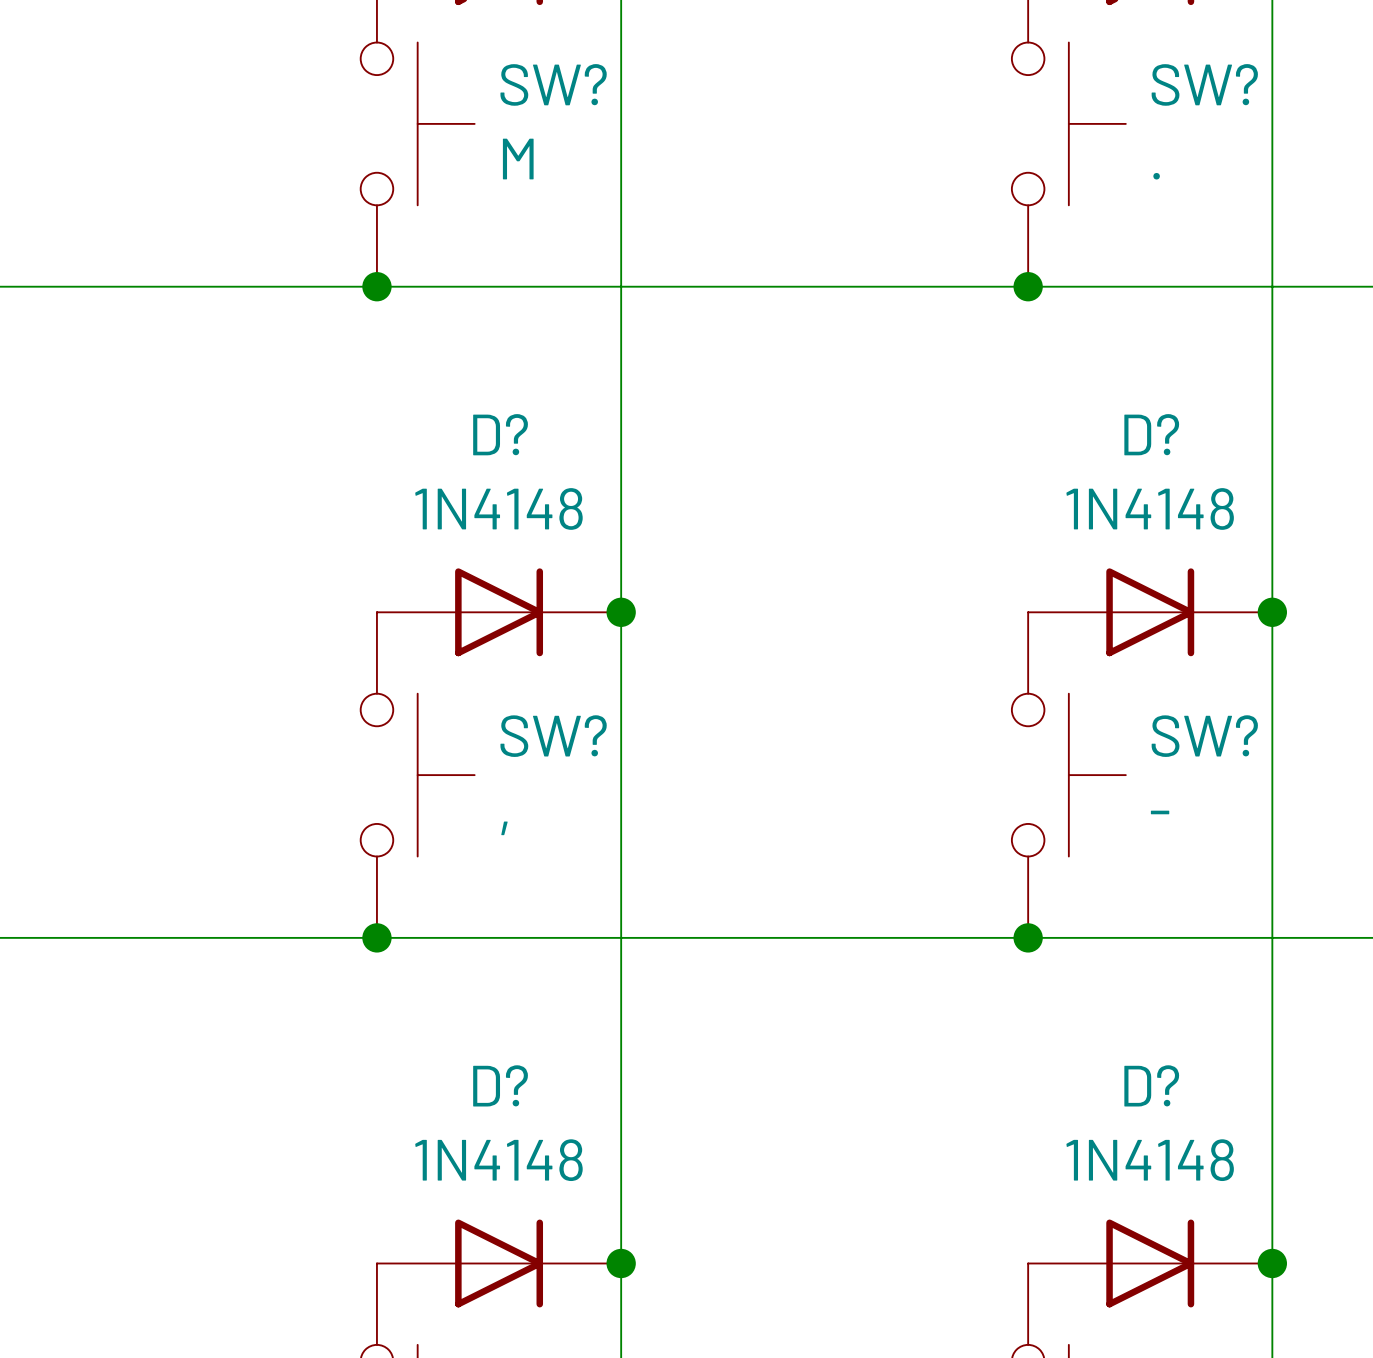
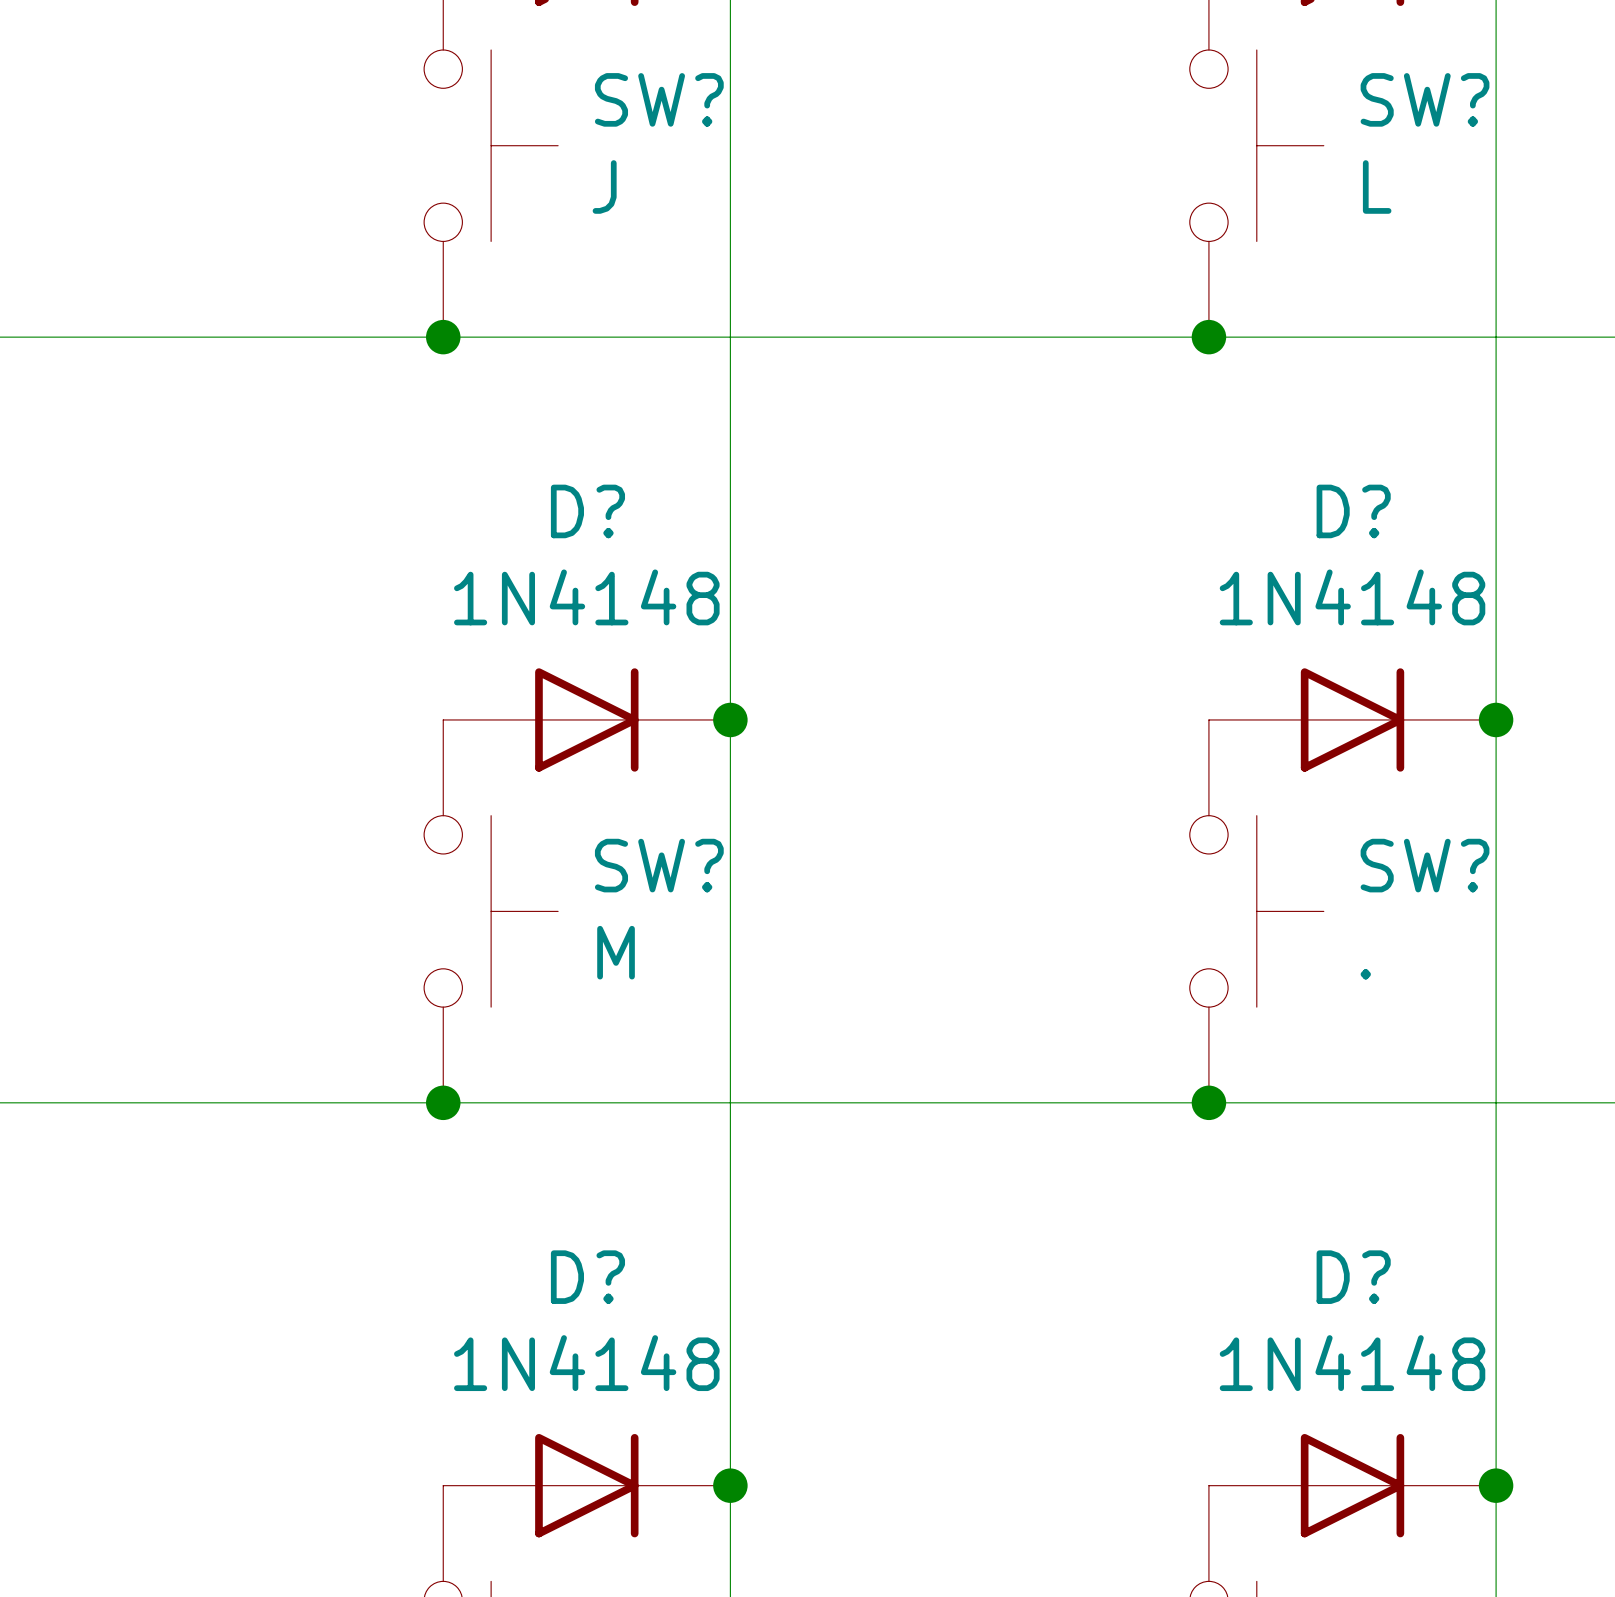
SW? value: M (518, 159) -> J (604, 186)
SW? value: . (1156, 176) -> L (1377, 186)
SW? value: - (1160, 812) -> . (1365, 974)
SW? value: , (504, 828) -> M (616, 952)

